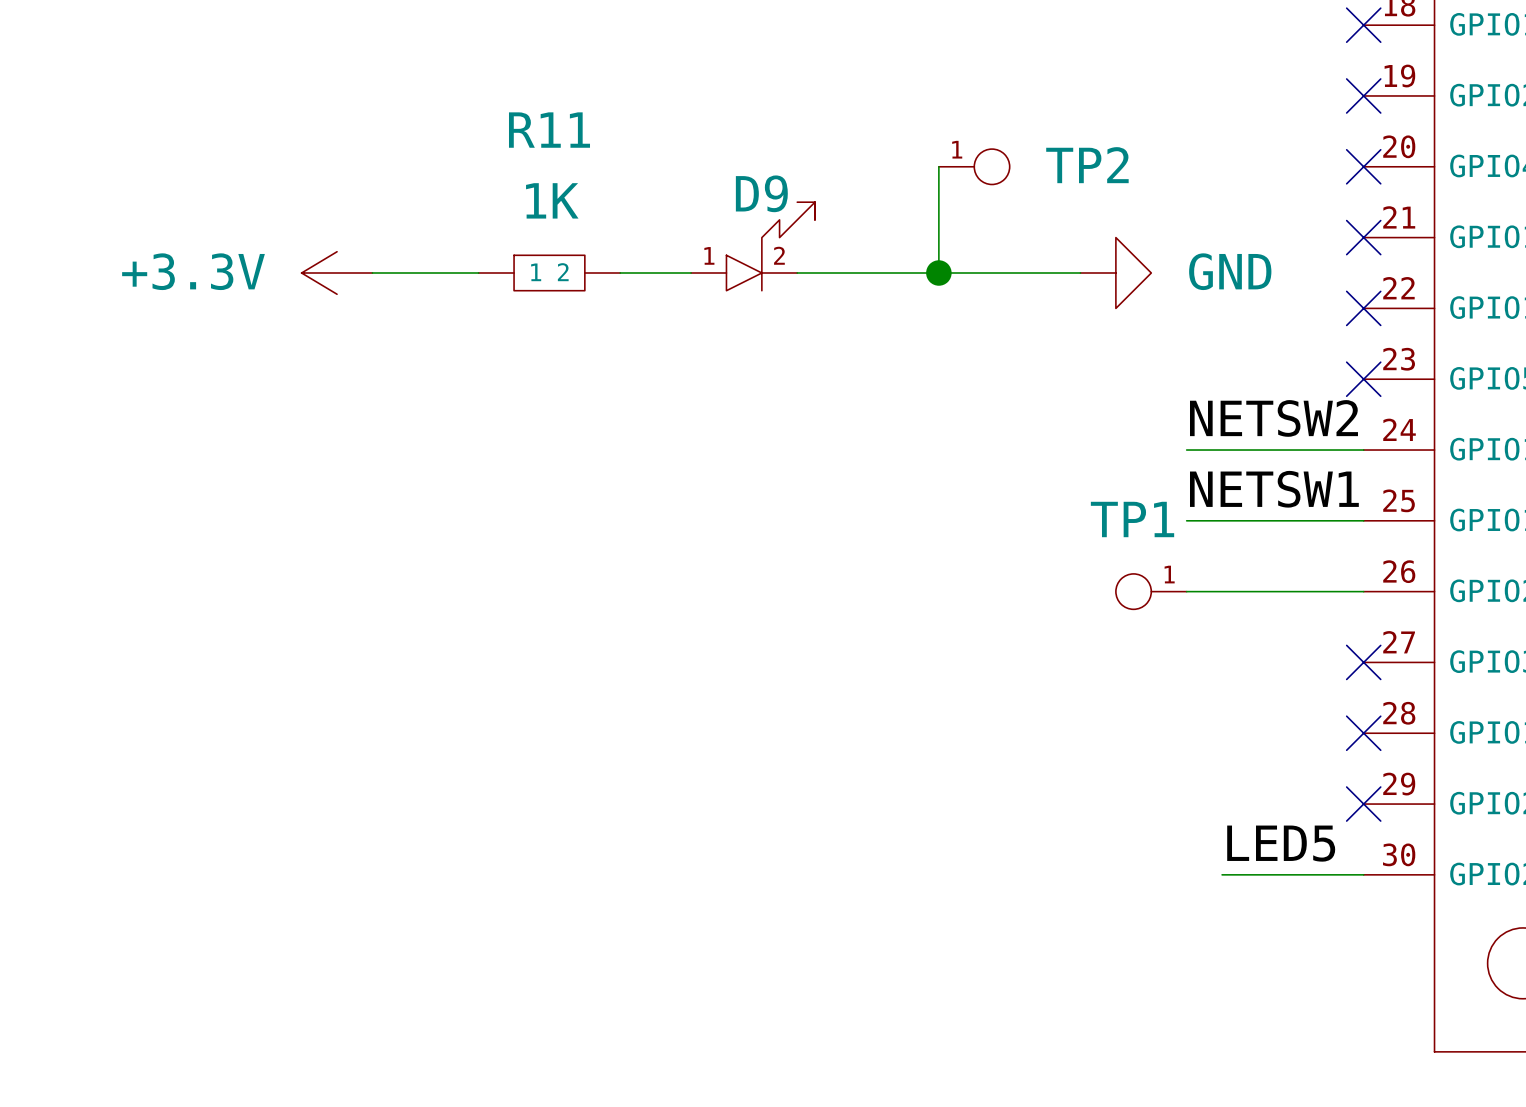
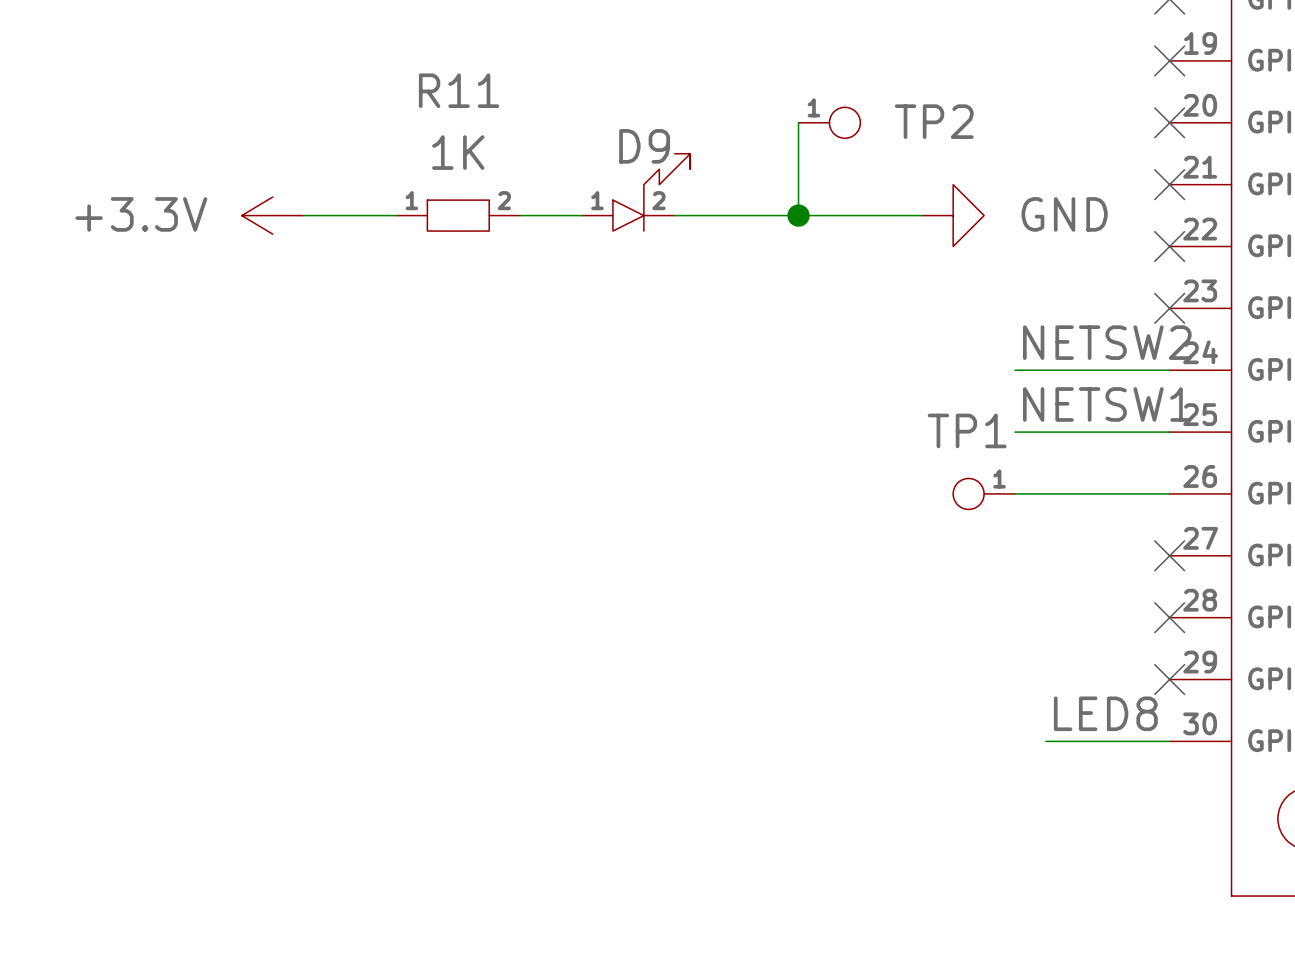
R11 pin number: none -> 1 (411, 200)
R11 pin number: none -> 2 (504, 200)
R11 pin name: 1 (536, 272) -> none
R11 pin name: 2 (563, 272) -> none
label: LED5 (1281, 843) -> LED8 (1105, 713)

